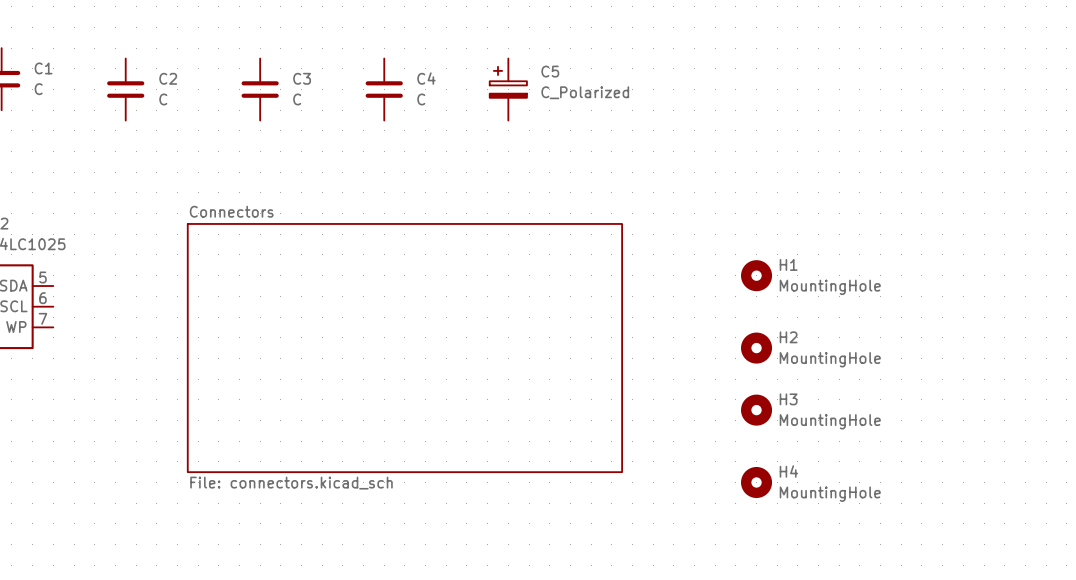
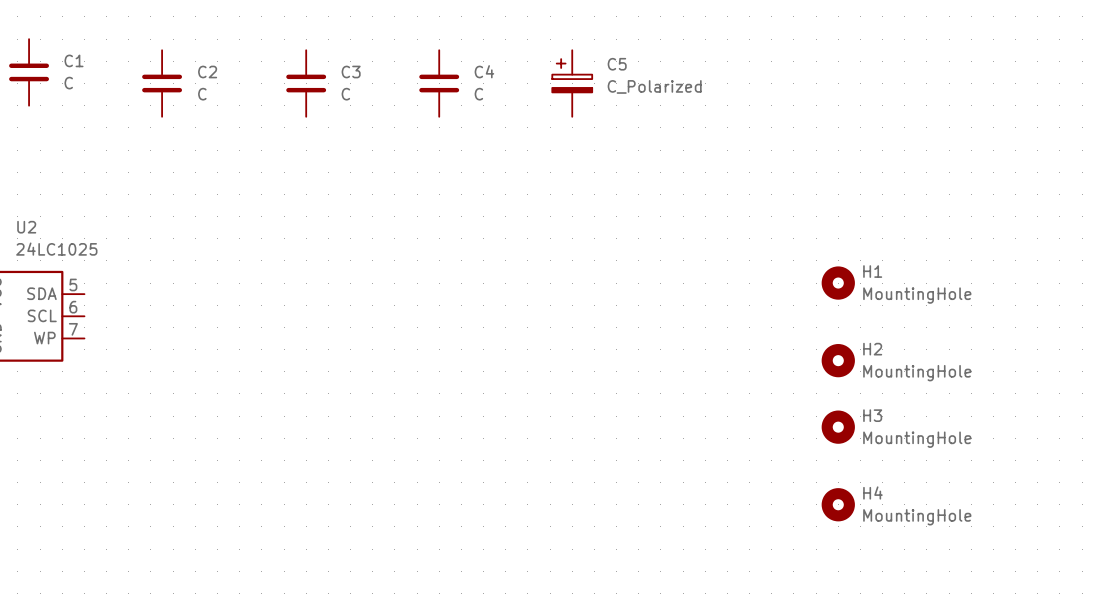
sheet Connectors: File: connectors.kicad_sch (404, 348) -> none

